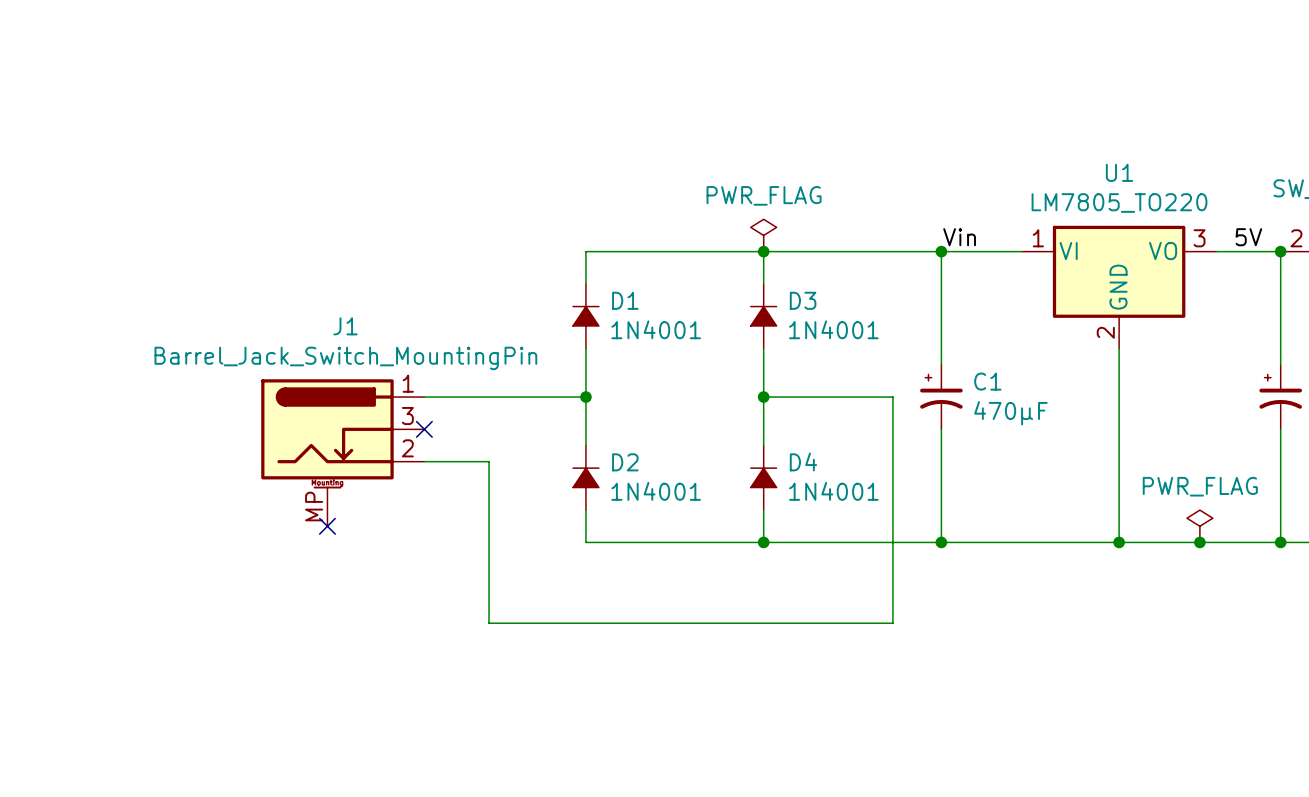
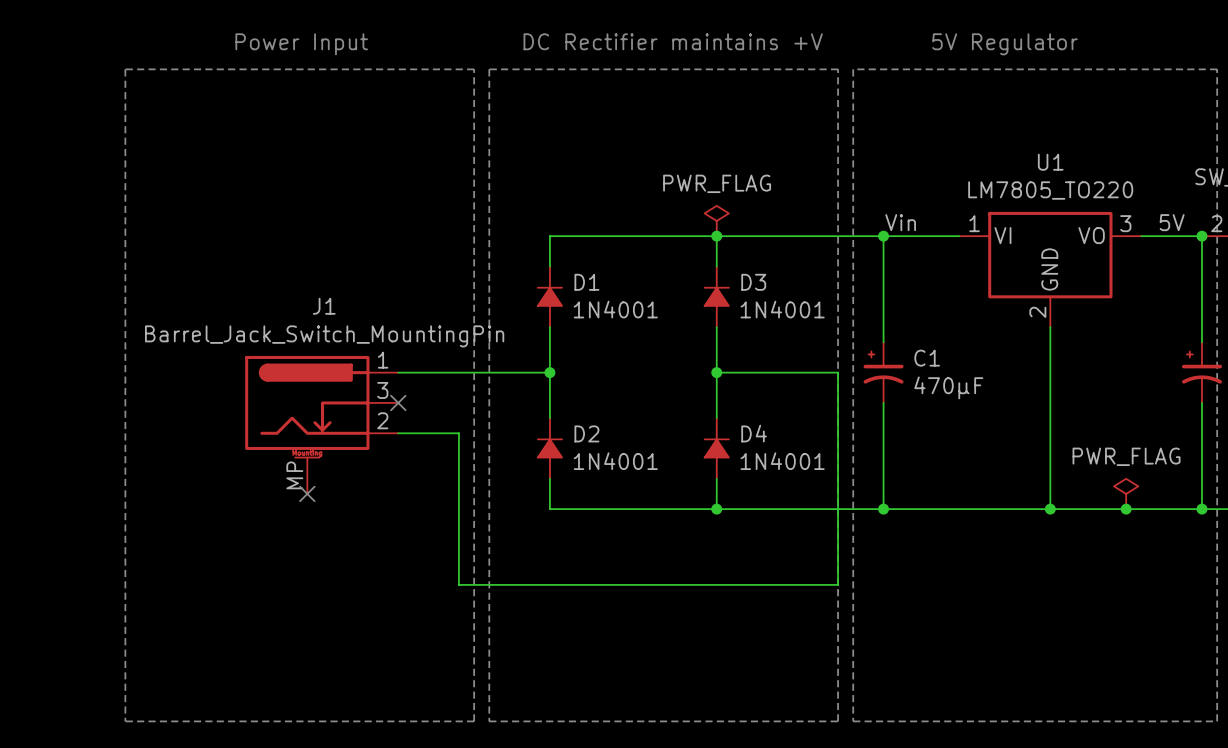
text: none -> DC Rectifier maintains +V (673, 41)
text: none -> Power Input (301, 44)
text: none -> 5V Regulator (1004, 44)
line: none -> (125, 69) (474, 69) (474, 721) (125, 721) (125, 69)
line: none -> (489, 69) (489, 721) (838, 721) (838, 69) (489, 69)
line: none -> (853, 69) (1217, 69) (1217, 721) (853, 721) (853, 69)

